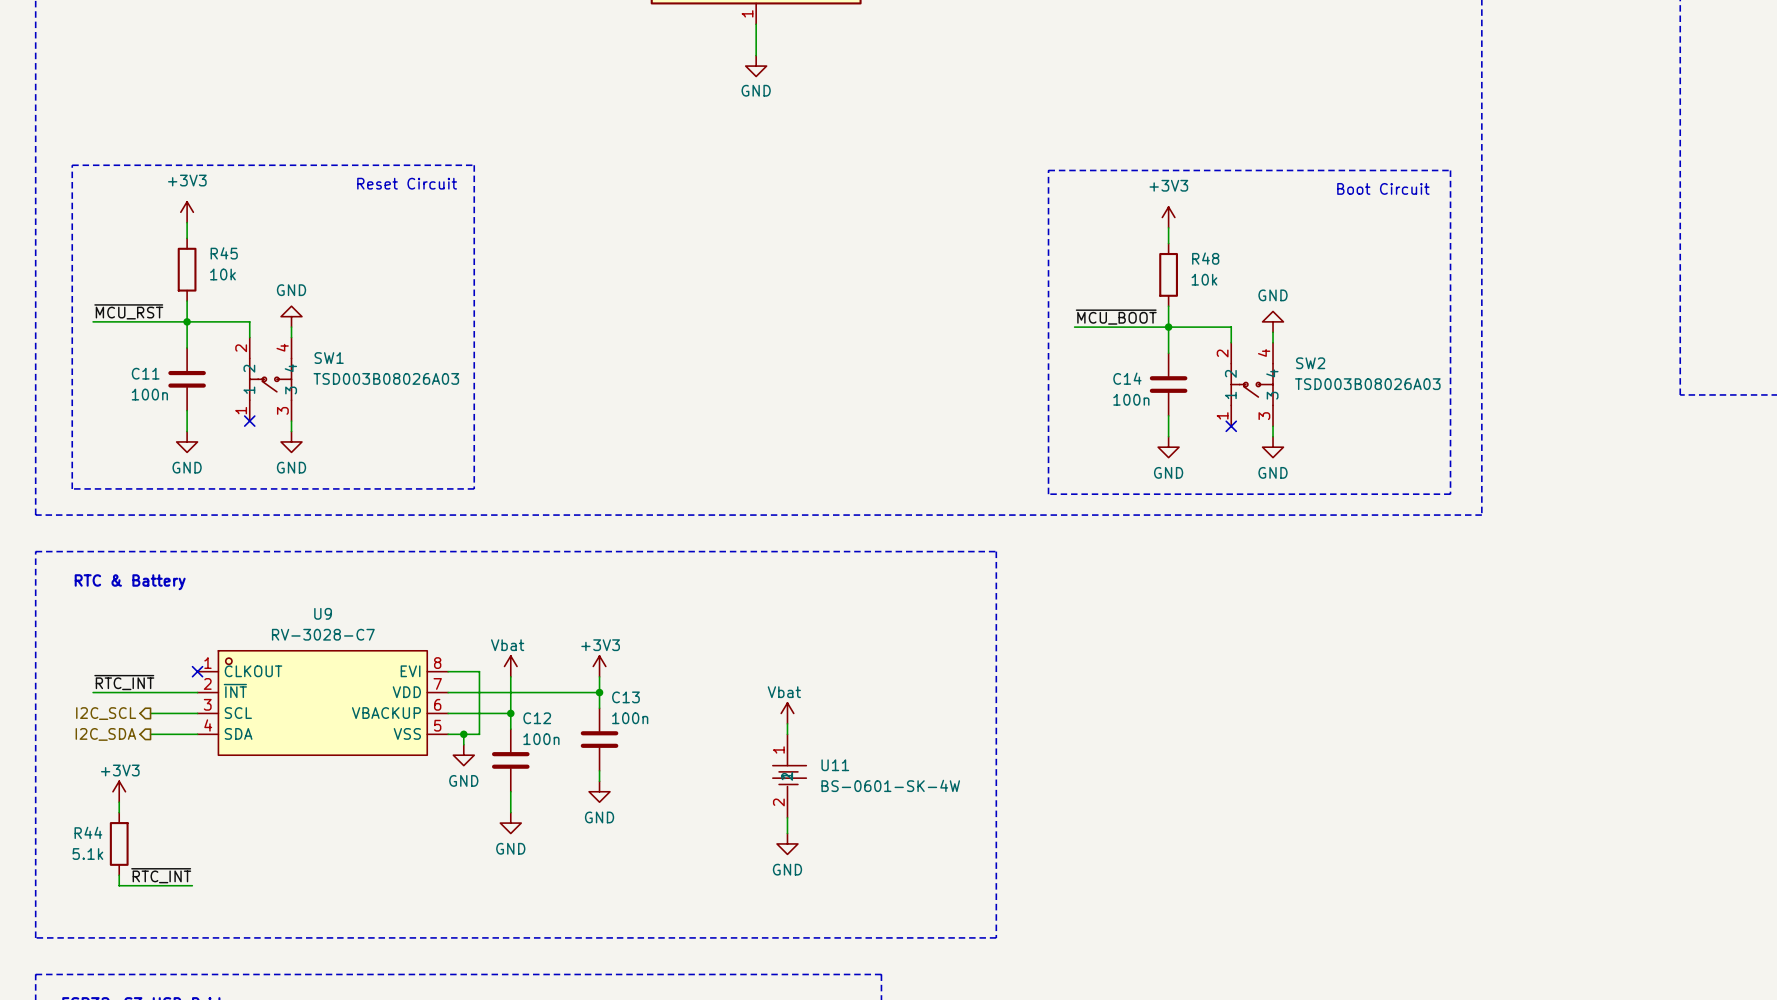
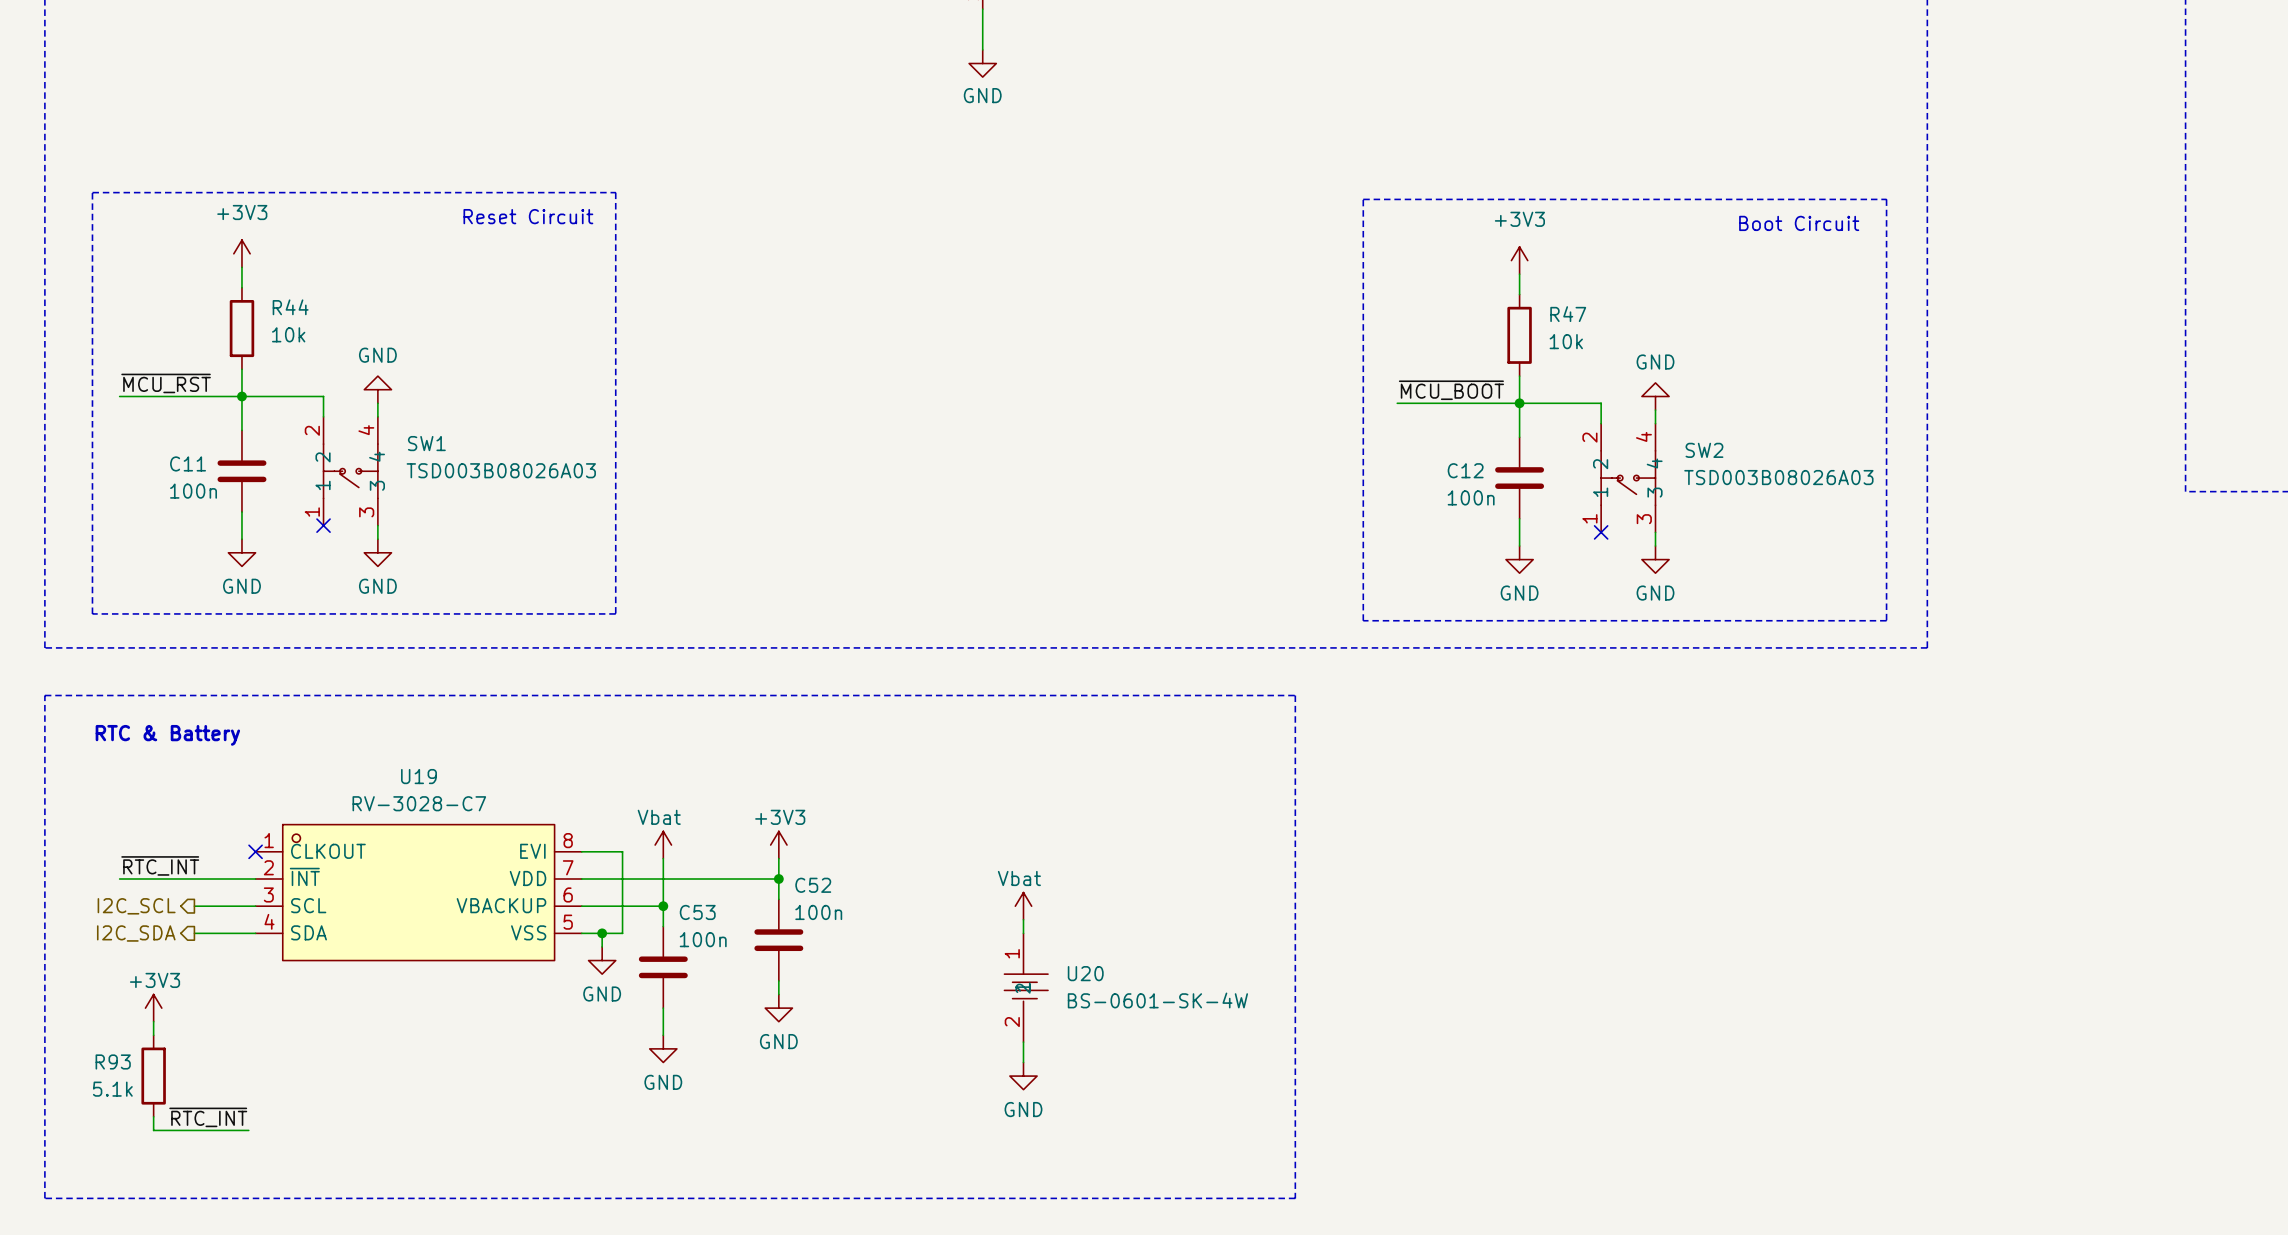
R45 name: R45 (224, 253) -> R44 (290, 307)
R48 name: R48 (1205, 258) -> R47 (1568, 314)
C14 name: C14 (1127, 378) -> C12 (1465, 470)
U9 name: U9 (323, 613) -> U19 (418, 776)
C13 name: C13 (625, 697) -> C52 (813, 885)
C12 name: C12 (537, 718) -> C53 (697, 912)
U11 name: U11 (835, 765) -> U20 (1085, 973)
R44 name: R44 (88, 832) -> R93 (113, 1061)

